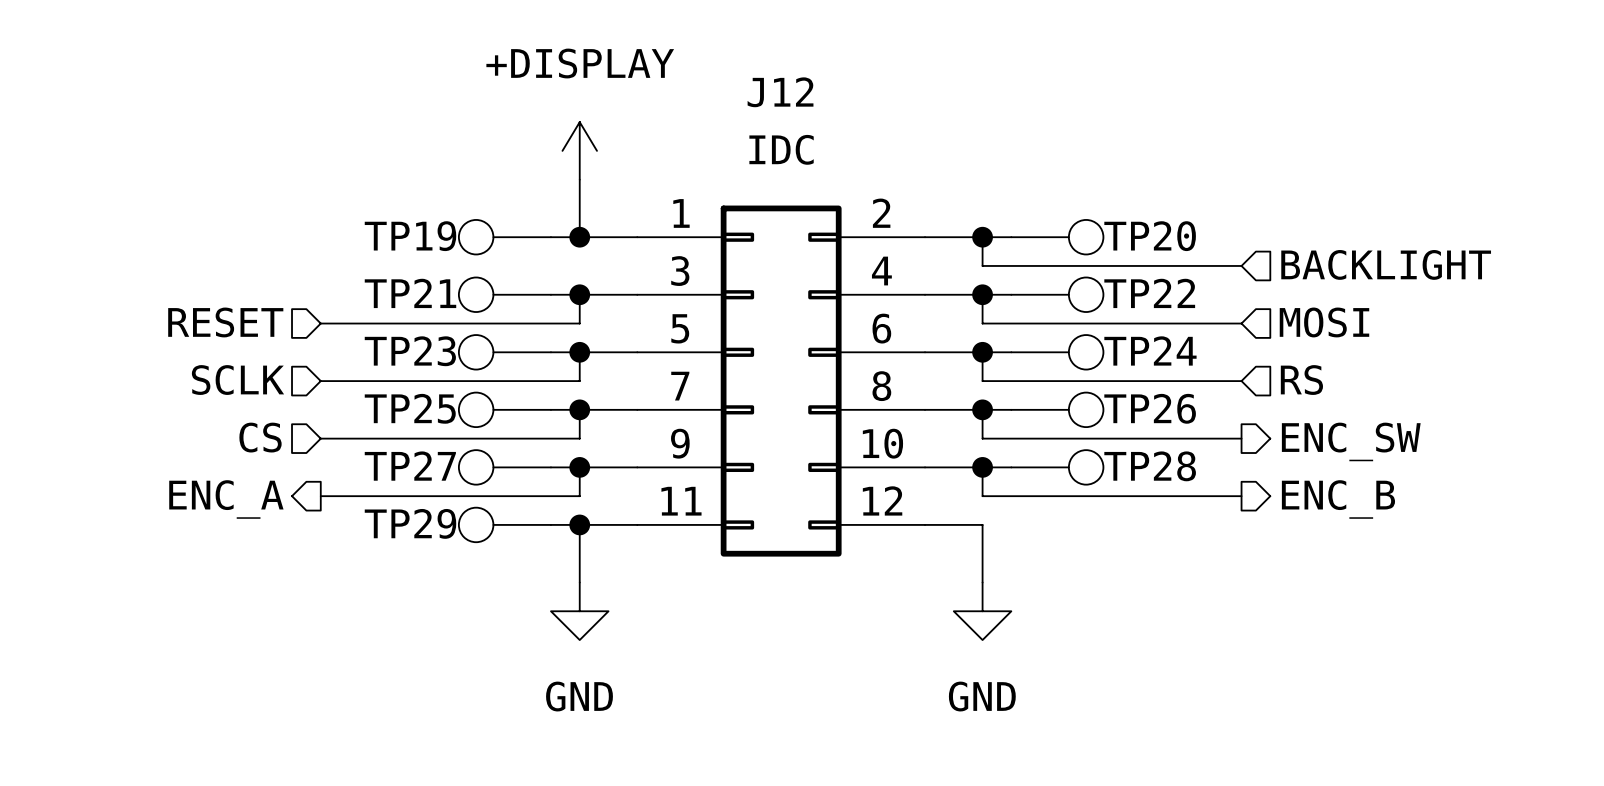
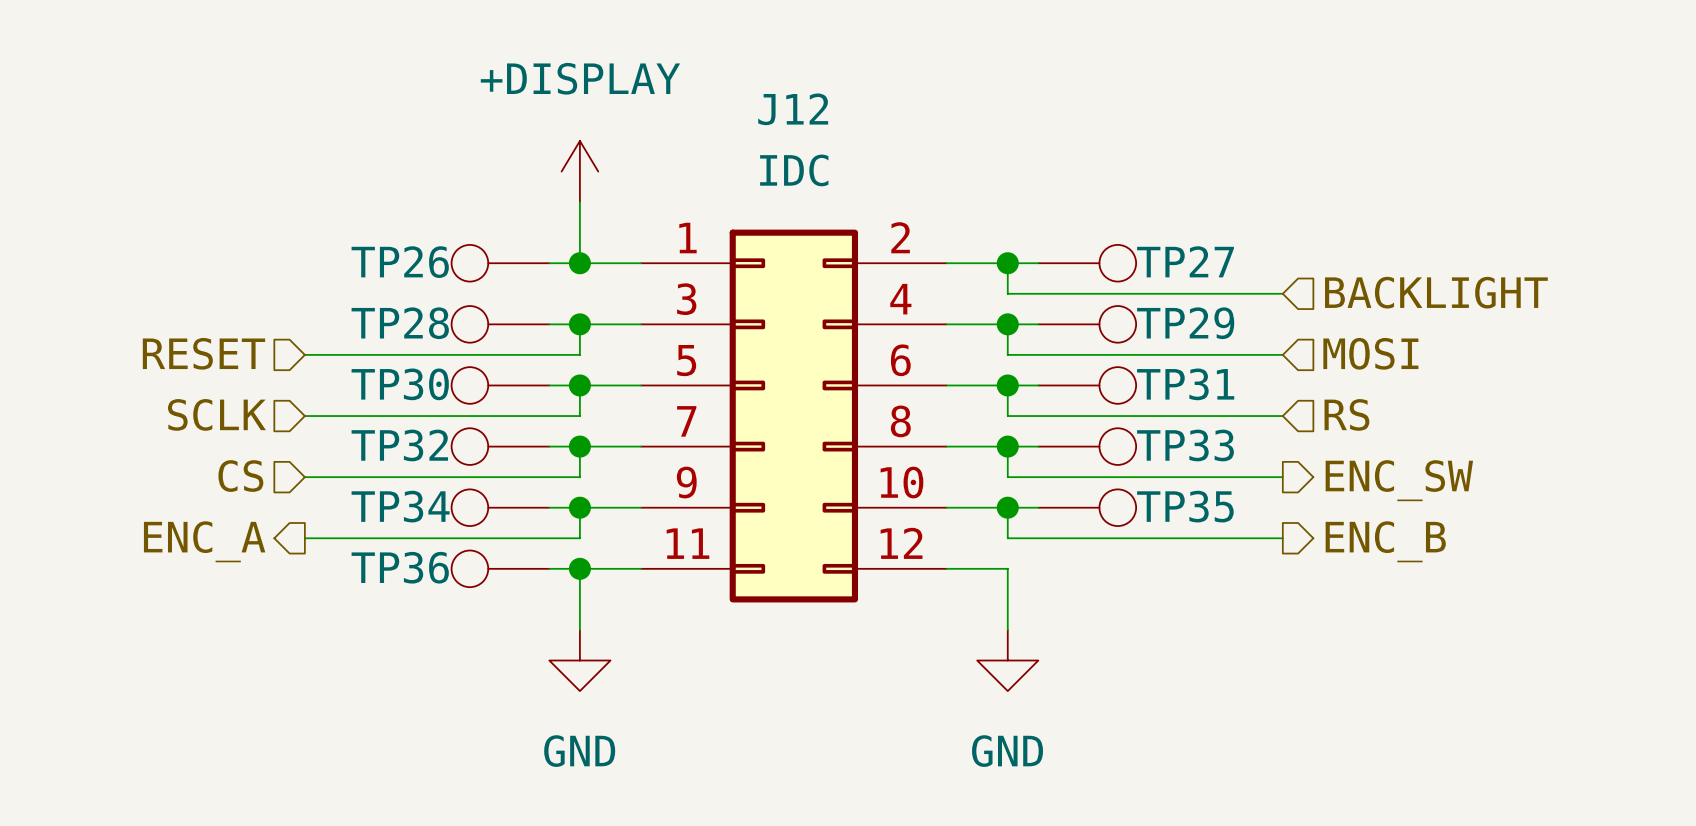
TP19 name: TP19 (410, 236) -> TP26 (400, 262)
TP20 name: TP20 (1150, 236) -> TP27 (1185, 261)
TP21 name: TP21 (410, 293) -> TP28 (400, 323)
TP22 name: TP22 (1149, 293) -> TP29 (1185, 323)
TP24 name: TP24 (1150, 350) -> TP31 (1185, 384)
TP23 name: TP23 (410, 351) -> TP30 (400, 384)
TP25 name: TP25 (410, 408) -> TP32 (399, 445)
TP26 name: TP26 (1150, 408) -> TP33 (1185, 445)
TP27 name: TP27 (410, 466) -> TP34 (400, 506)
TP28 name: TP28 (1150, 466) -> TP35 (1185, 506)
TP29 name: TP29 (410, 523) -> TP36 (400, 567)

